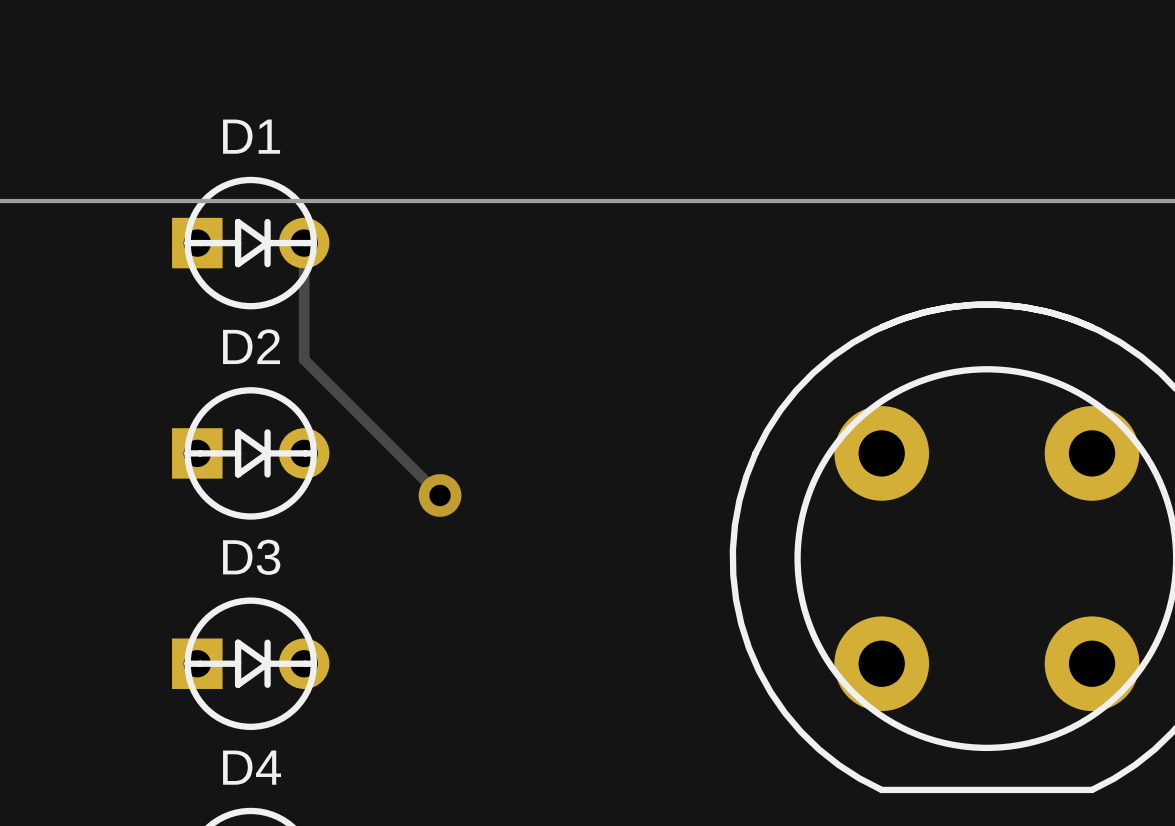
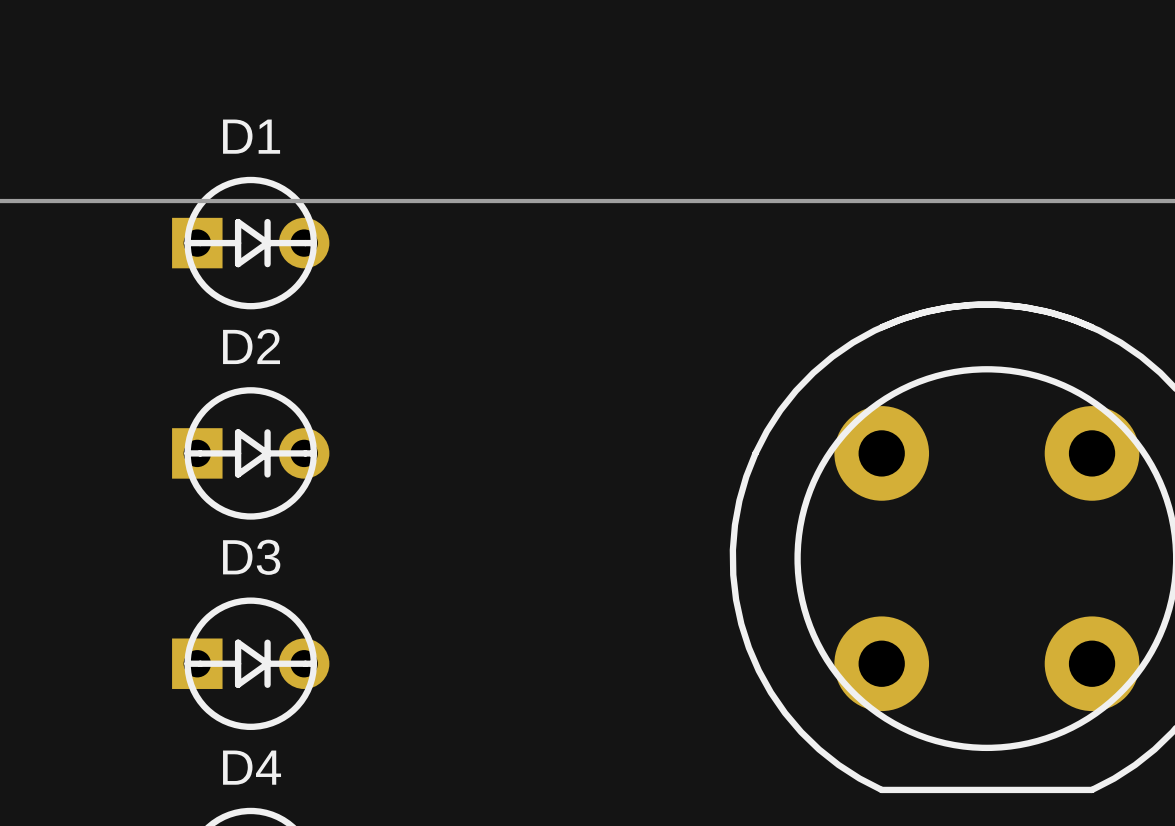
track: (304, 243) (304, 359) (440, 495) -> none
via: (440, 495) -> none

